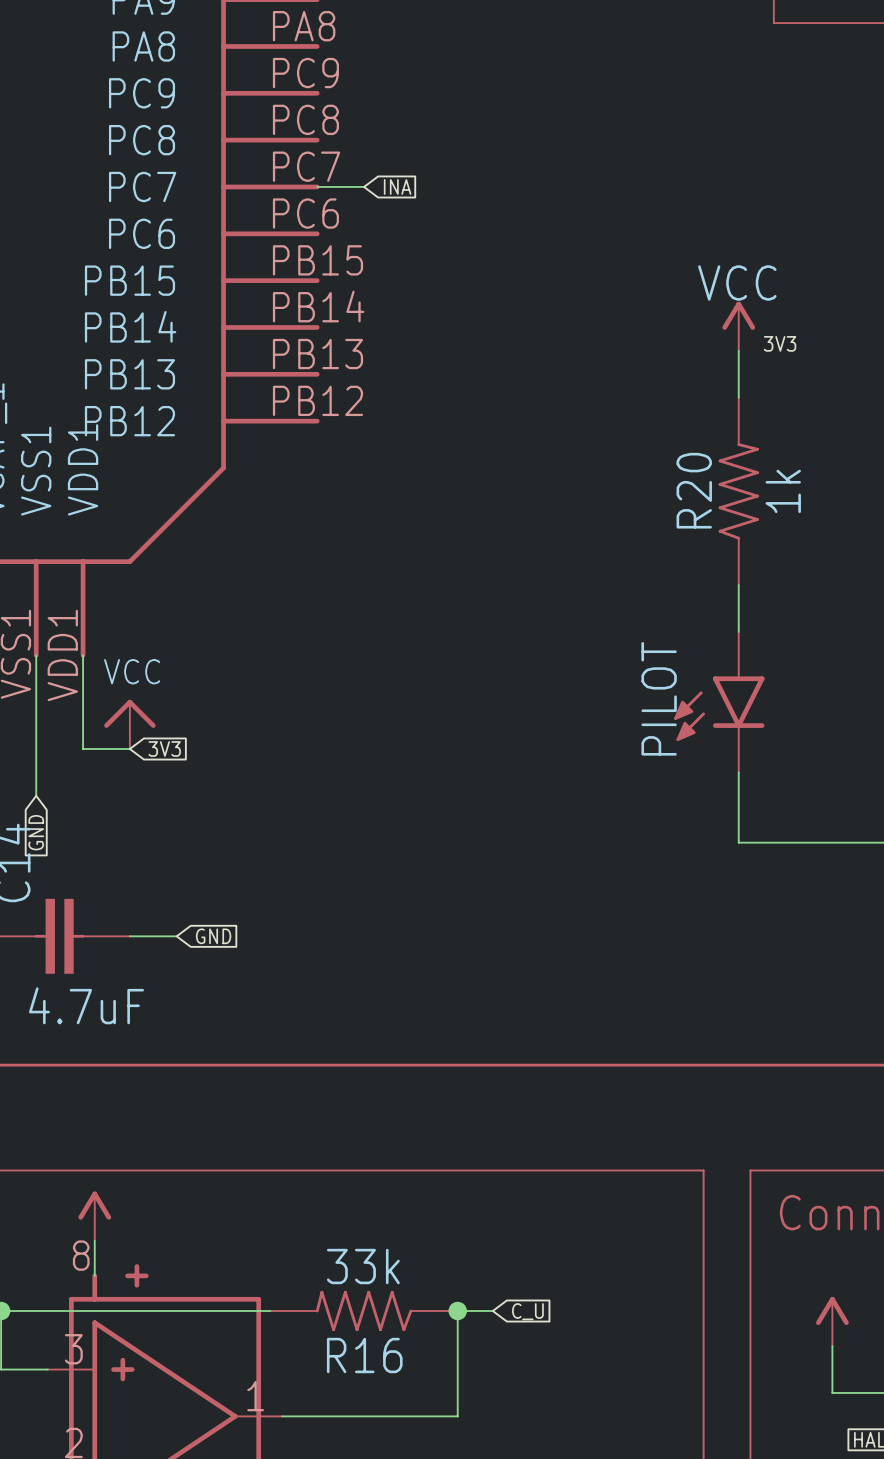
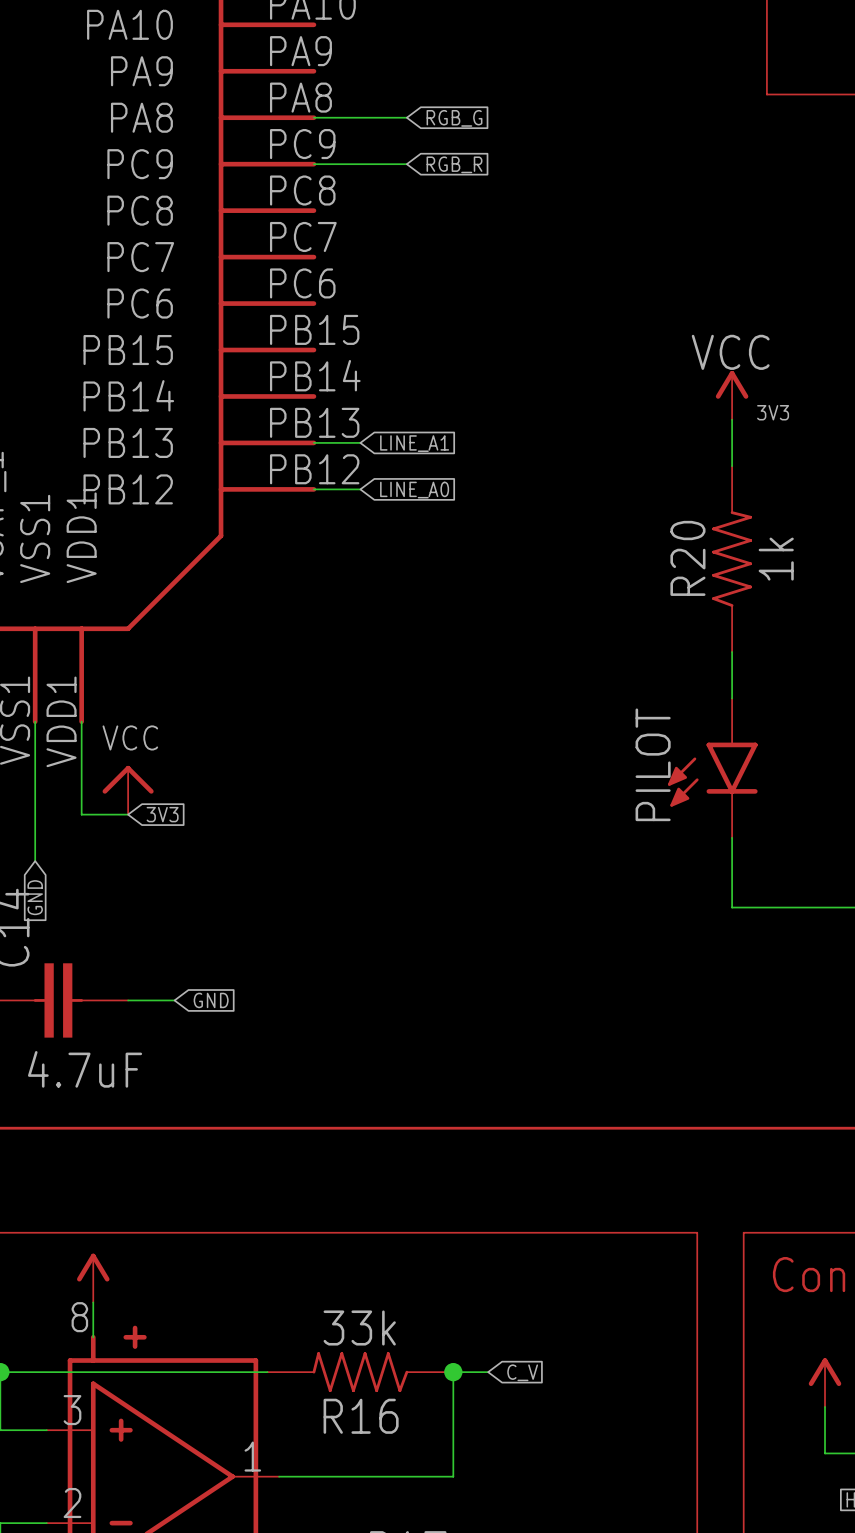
wire: none -> (313, 117) (406, 117)
global label: none -> RGB_G (454, 118)
wire: none -> (313, 164) (406, 164)
global label: none -> RGB_R (454, 164)
wire: (317, 186) (364, 186) -> (313, 442) (360, 442)
global label: INA (397, 186) -> none
global label: none -> LINE_A1 (414, 443)
wire: none -> (313, 489) (360, 489)
global label: none -> LINE_A0 (414, 490)
global label: C_U (527, 1311) -> C_V (522, 1372)

